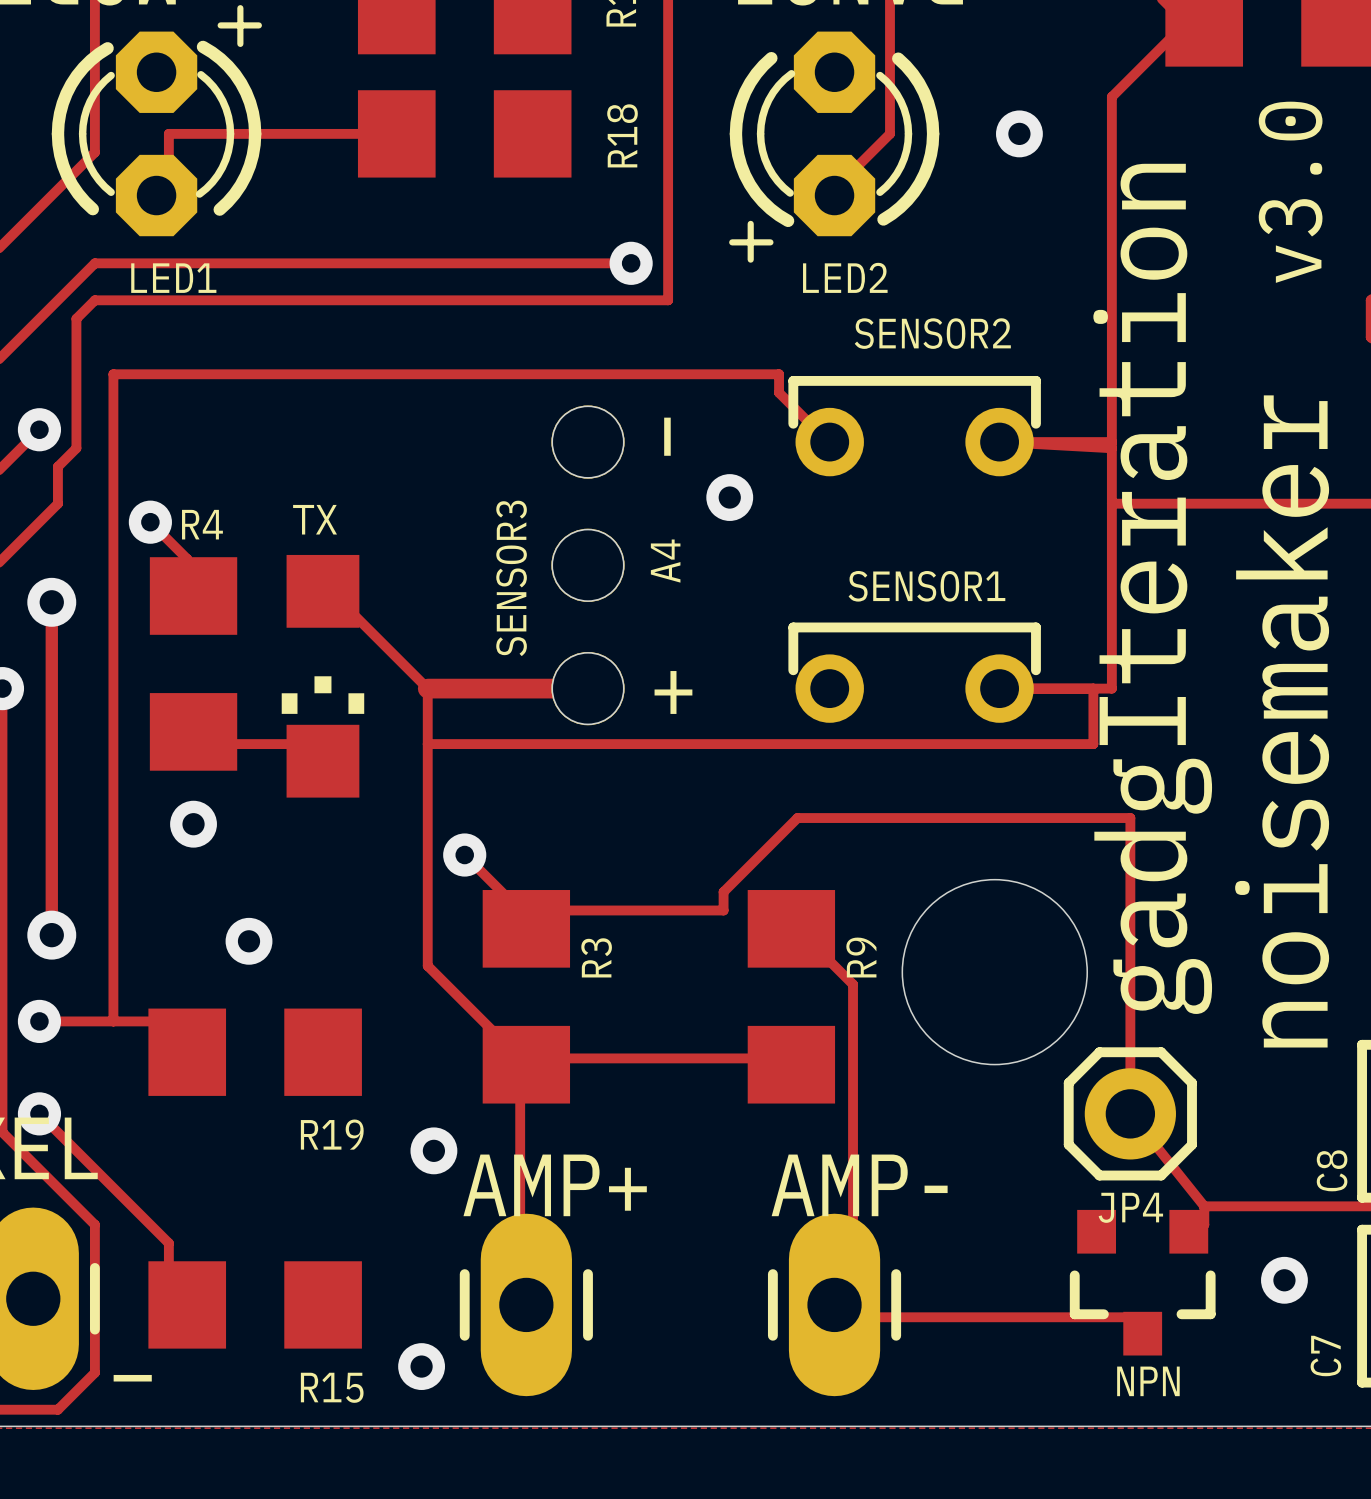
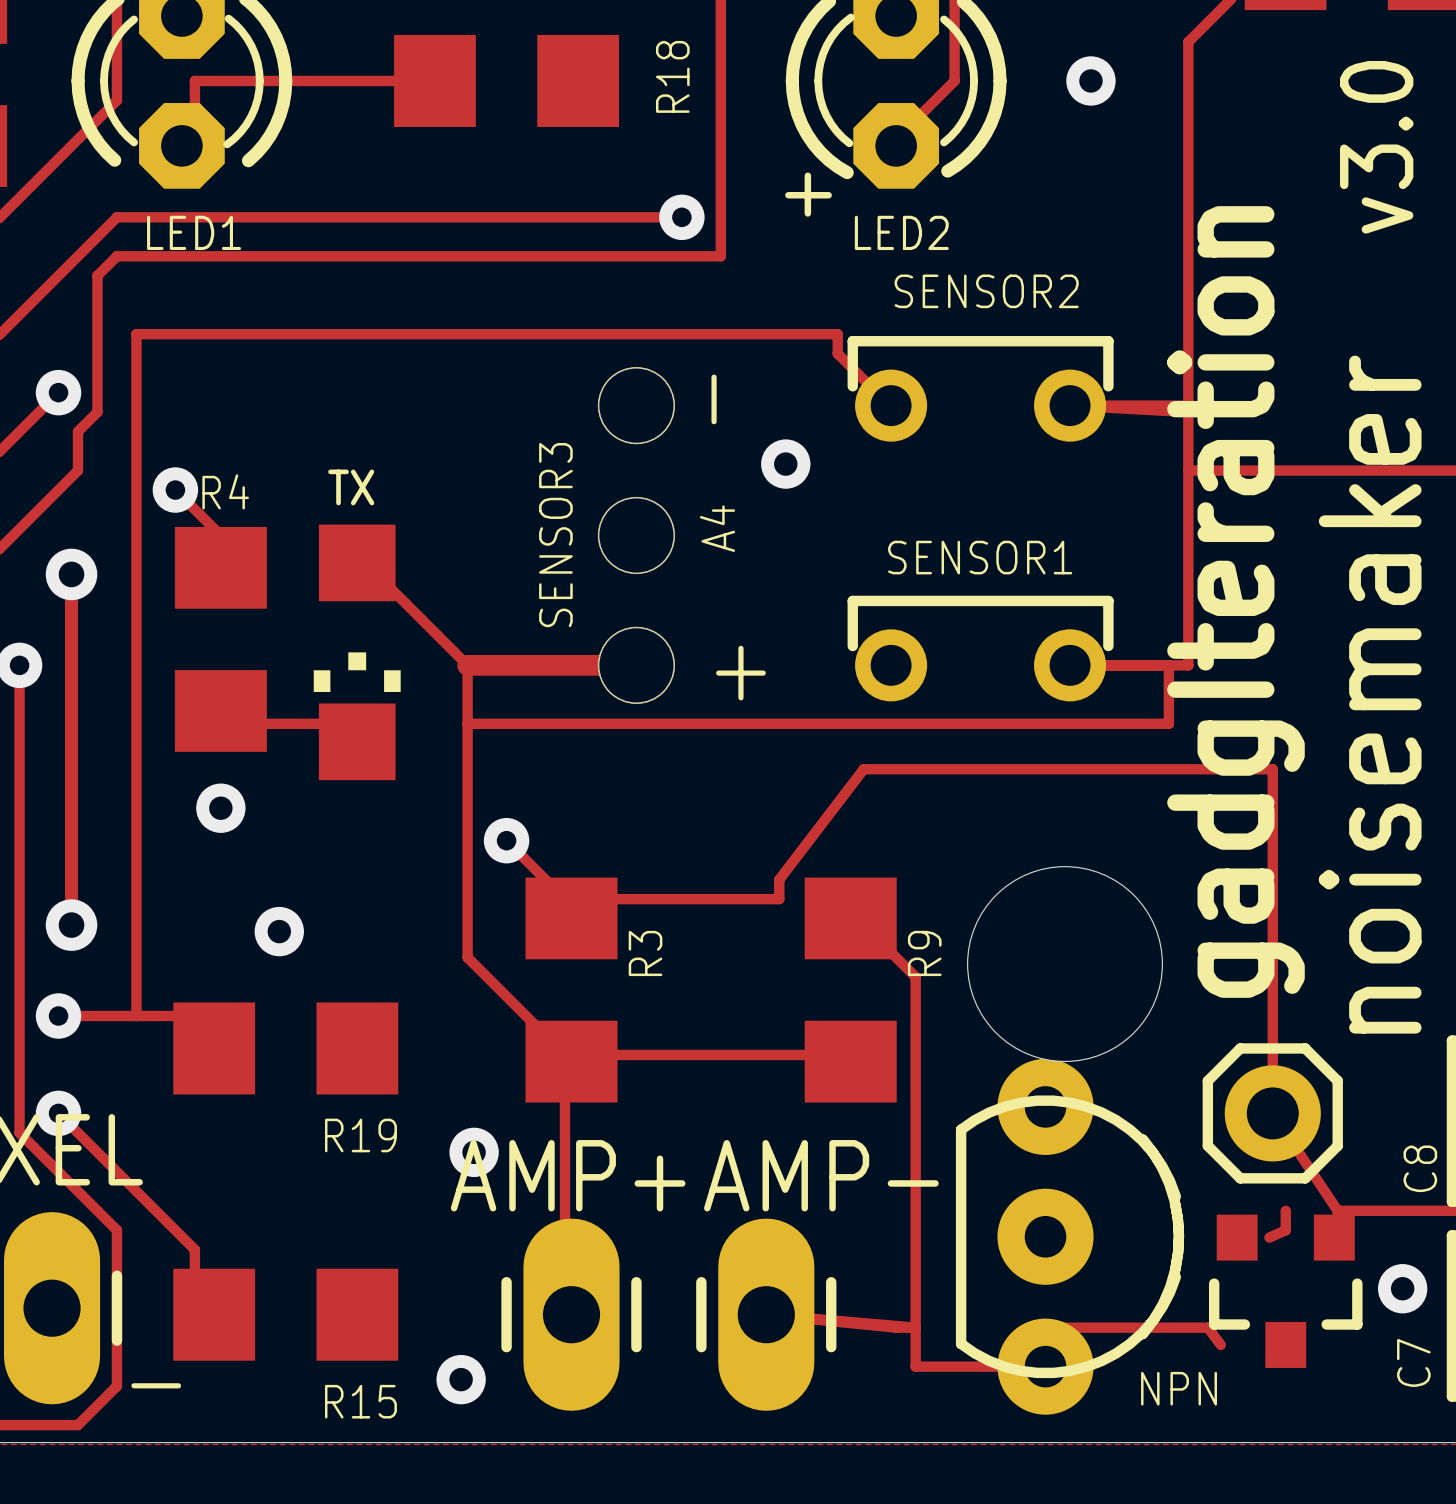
track: (723, 891) (797, 818) (1130, 818) (1130, 1113) (1204, 1206) (1253, 1206) -> (779, 879) (863, 769) (1272, 769) (1272, 1113) (1337, 1210) (1337, 1223) (1334, 1237)
JP4: (1130, 1113) -> none
part: none -> (1272, 1113)
AMP+ name position: AMP+ (555, 1185) -> AMP+ (568, 1175)
AMP- name position: AMP- (859, 1185) -> AMP- (821, 1175)
part: none -> (1070, 1236)
via position: (1284, 1280) -> (1402, 1288)
NPN position: (1142, 1282) -> (1285, 1291)
AMP- position: (834, 1304) -> (766, 1314)
track: (834, 1317) (834, 1304) (853, 1317) (982, 1317) -> (896, 1327) (766, 1314) (915, 1327) (915, 1366) (1052, 1366) (1052, 1327)
NPN name position: NPN (1148, 1381) -> NPN (1179, 1388)

